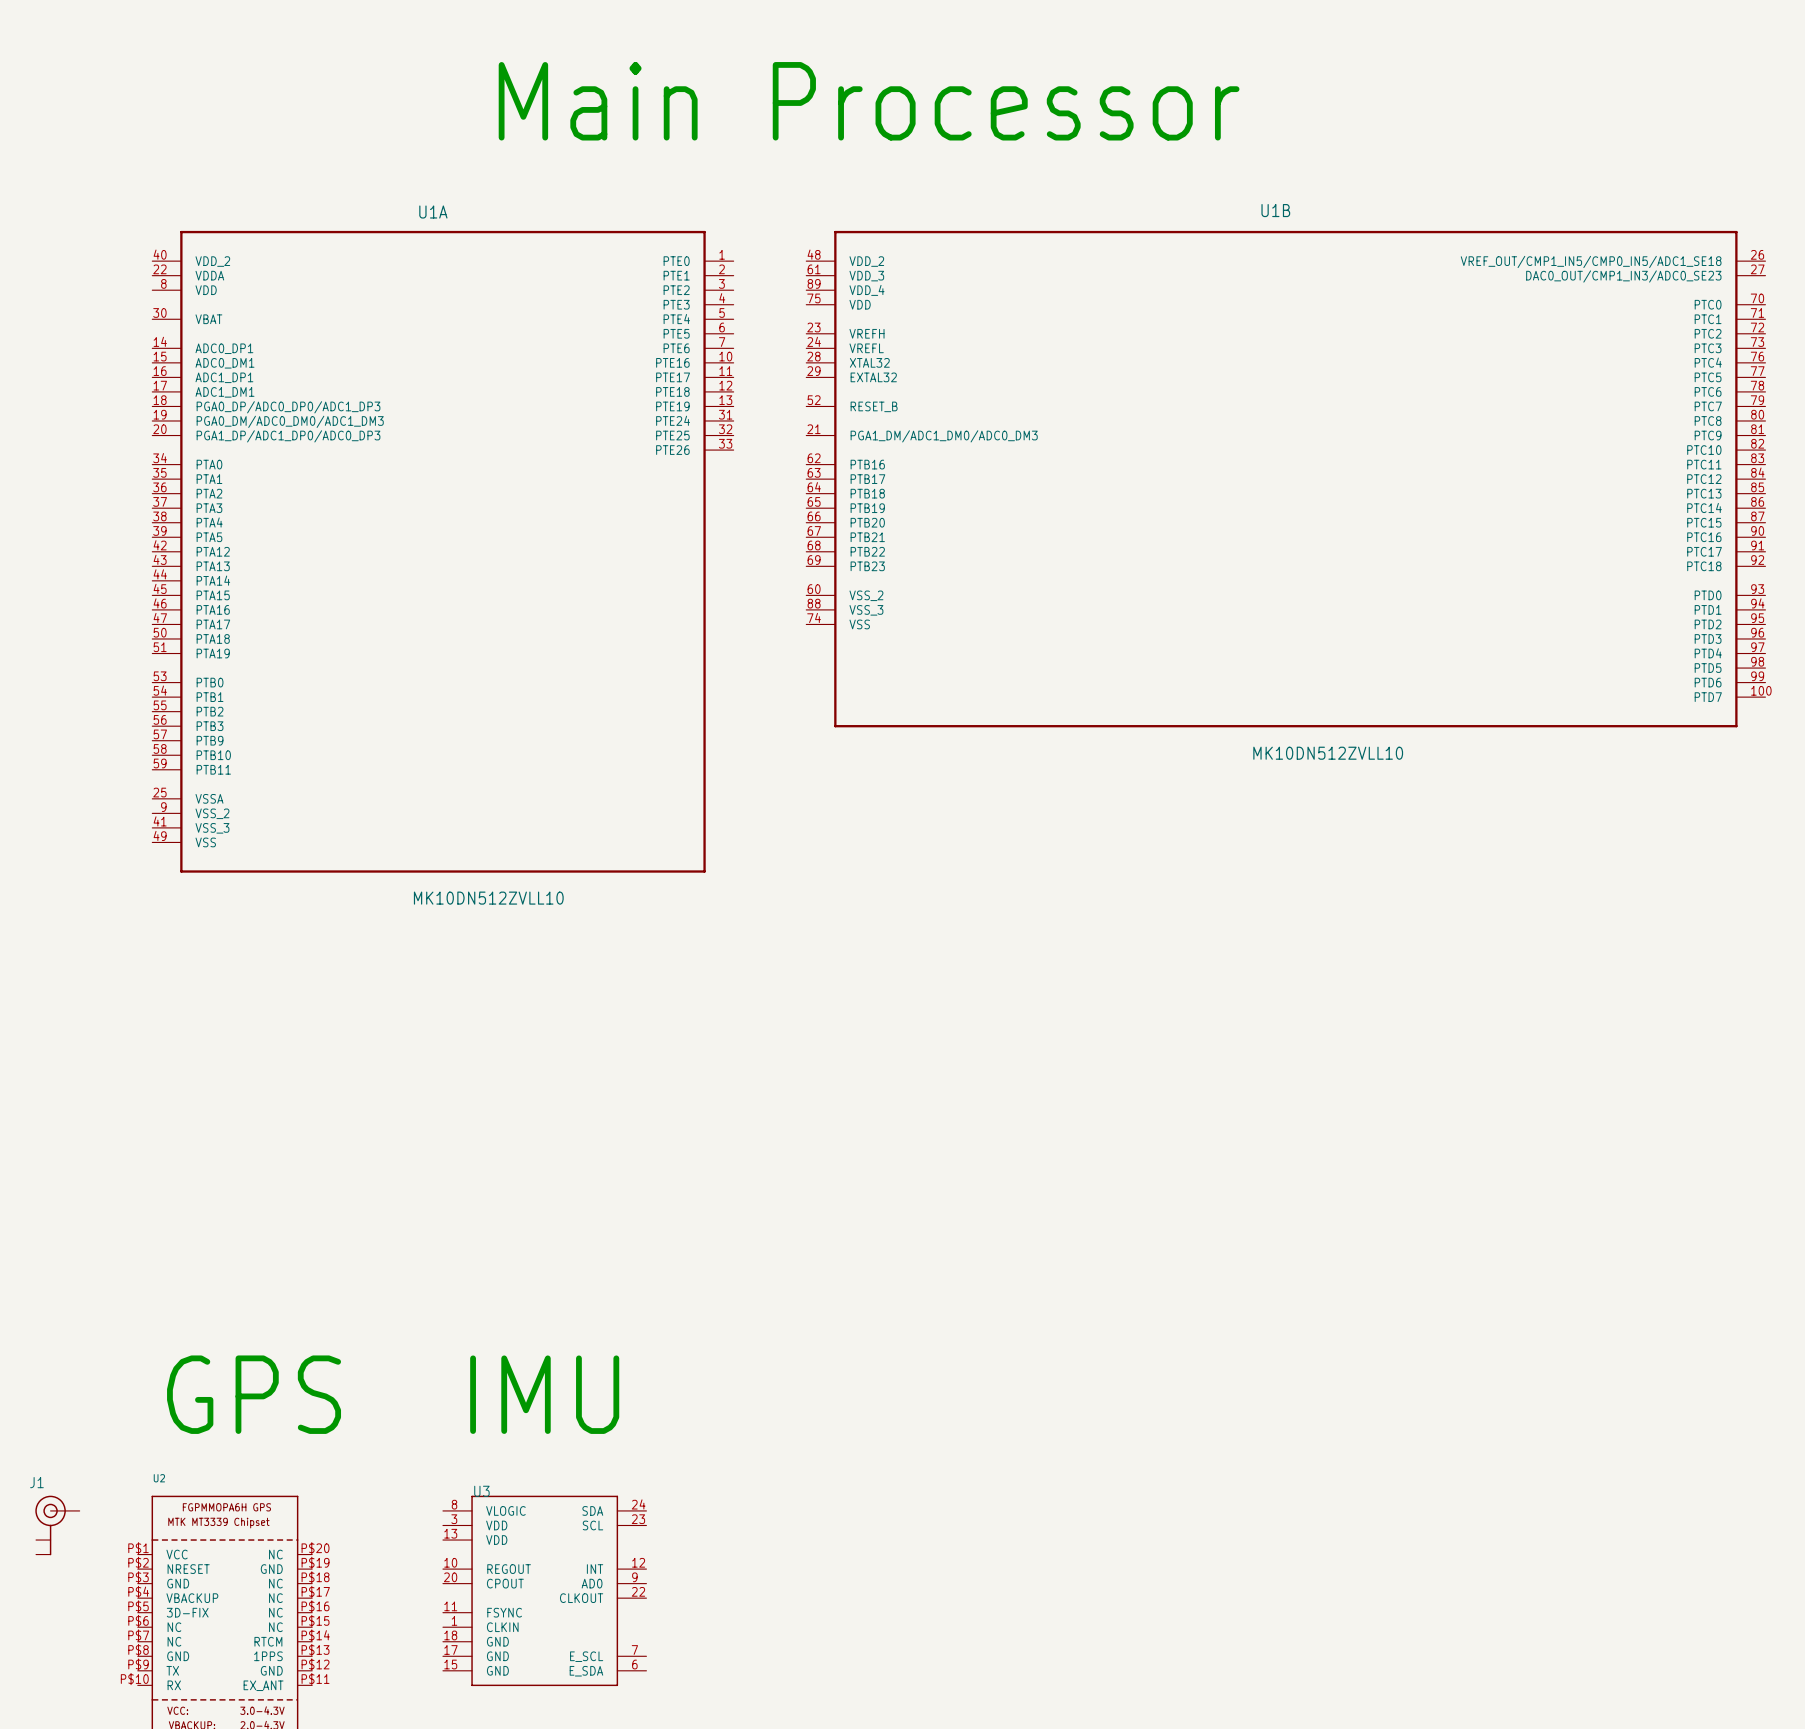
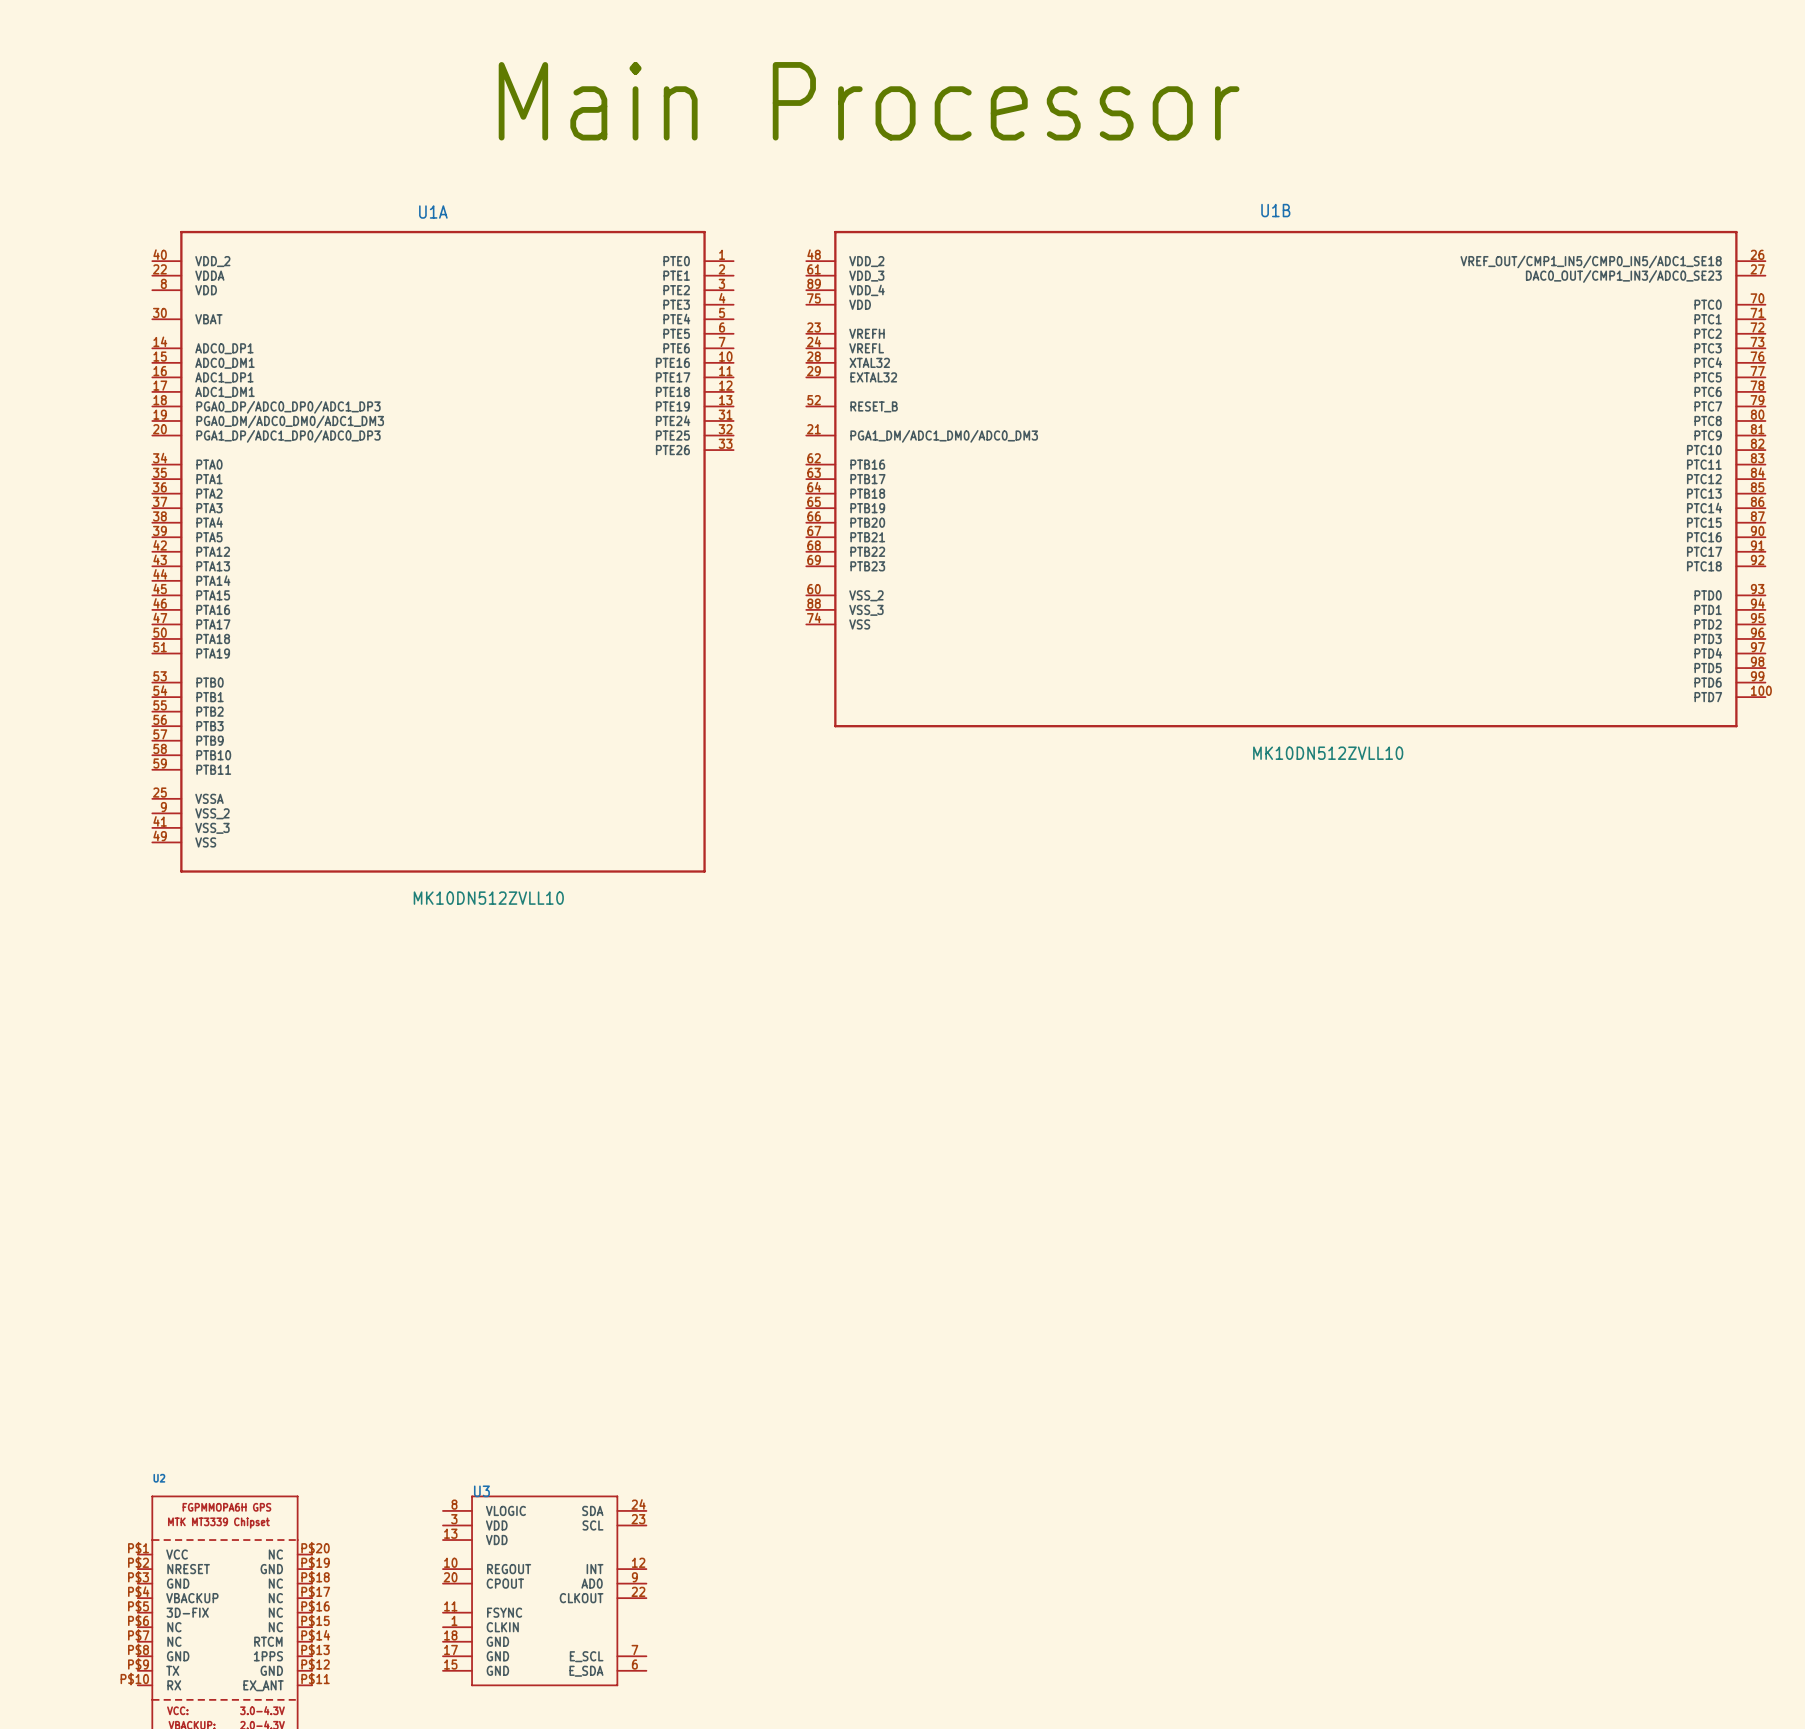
text: GPS (254, 1394) -> none
text: IMU (544, 1394) -> none
J1: (57, 1525) -> none

